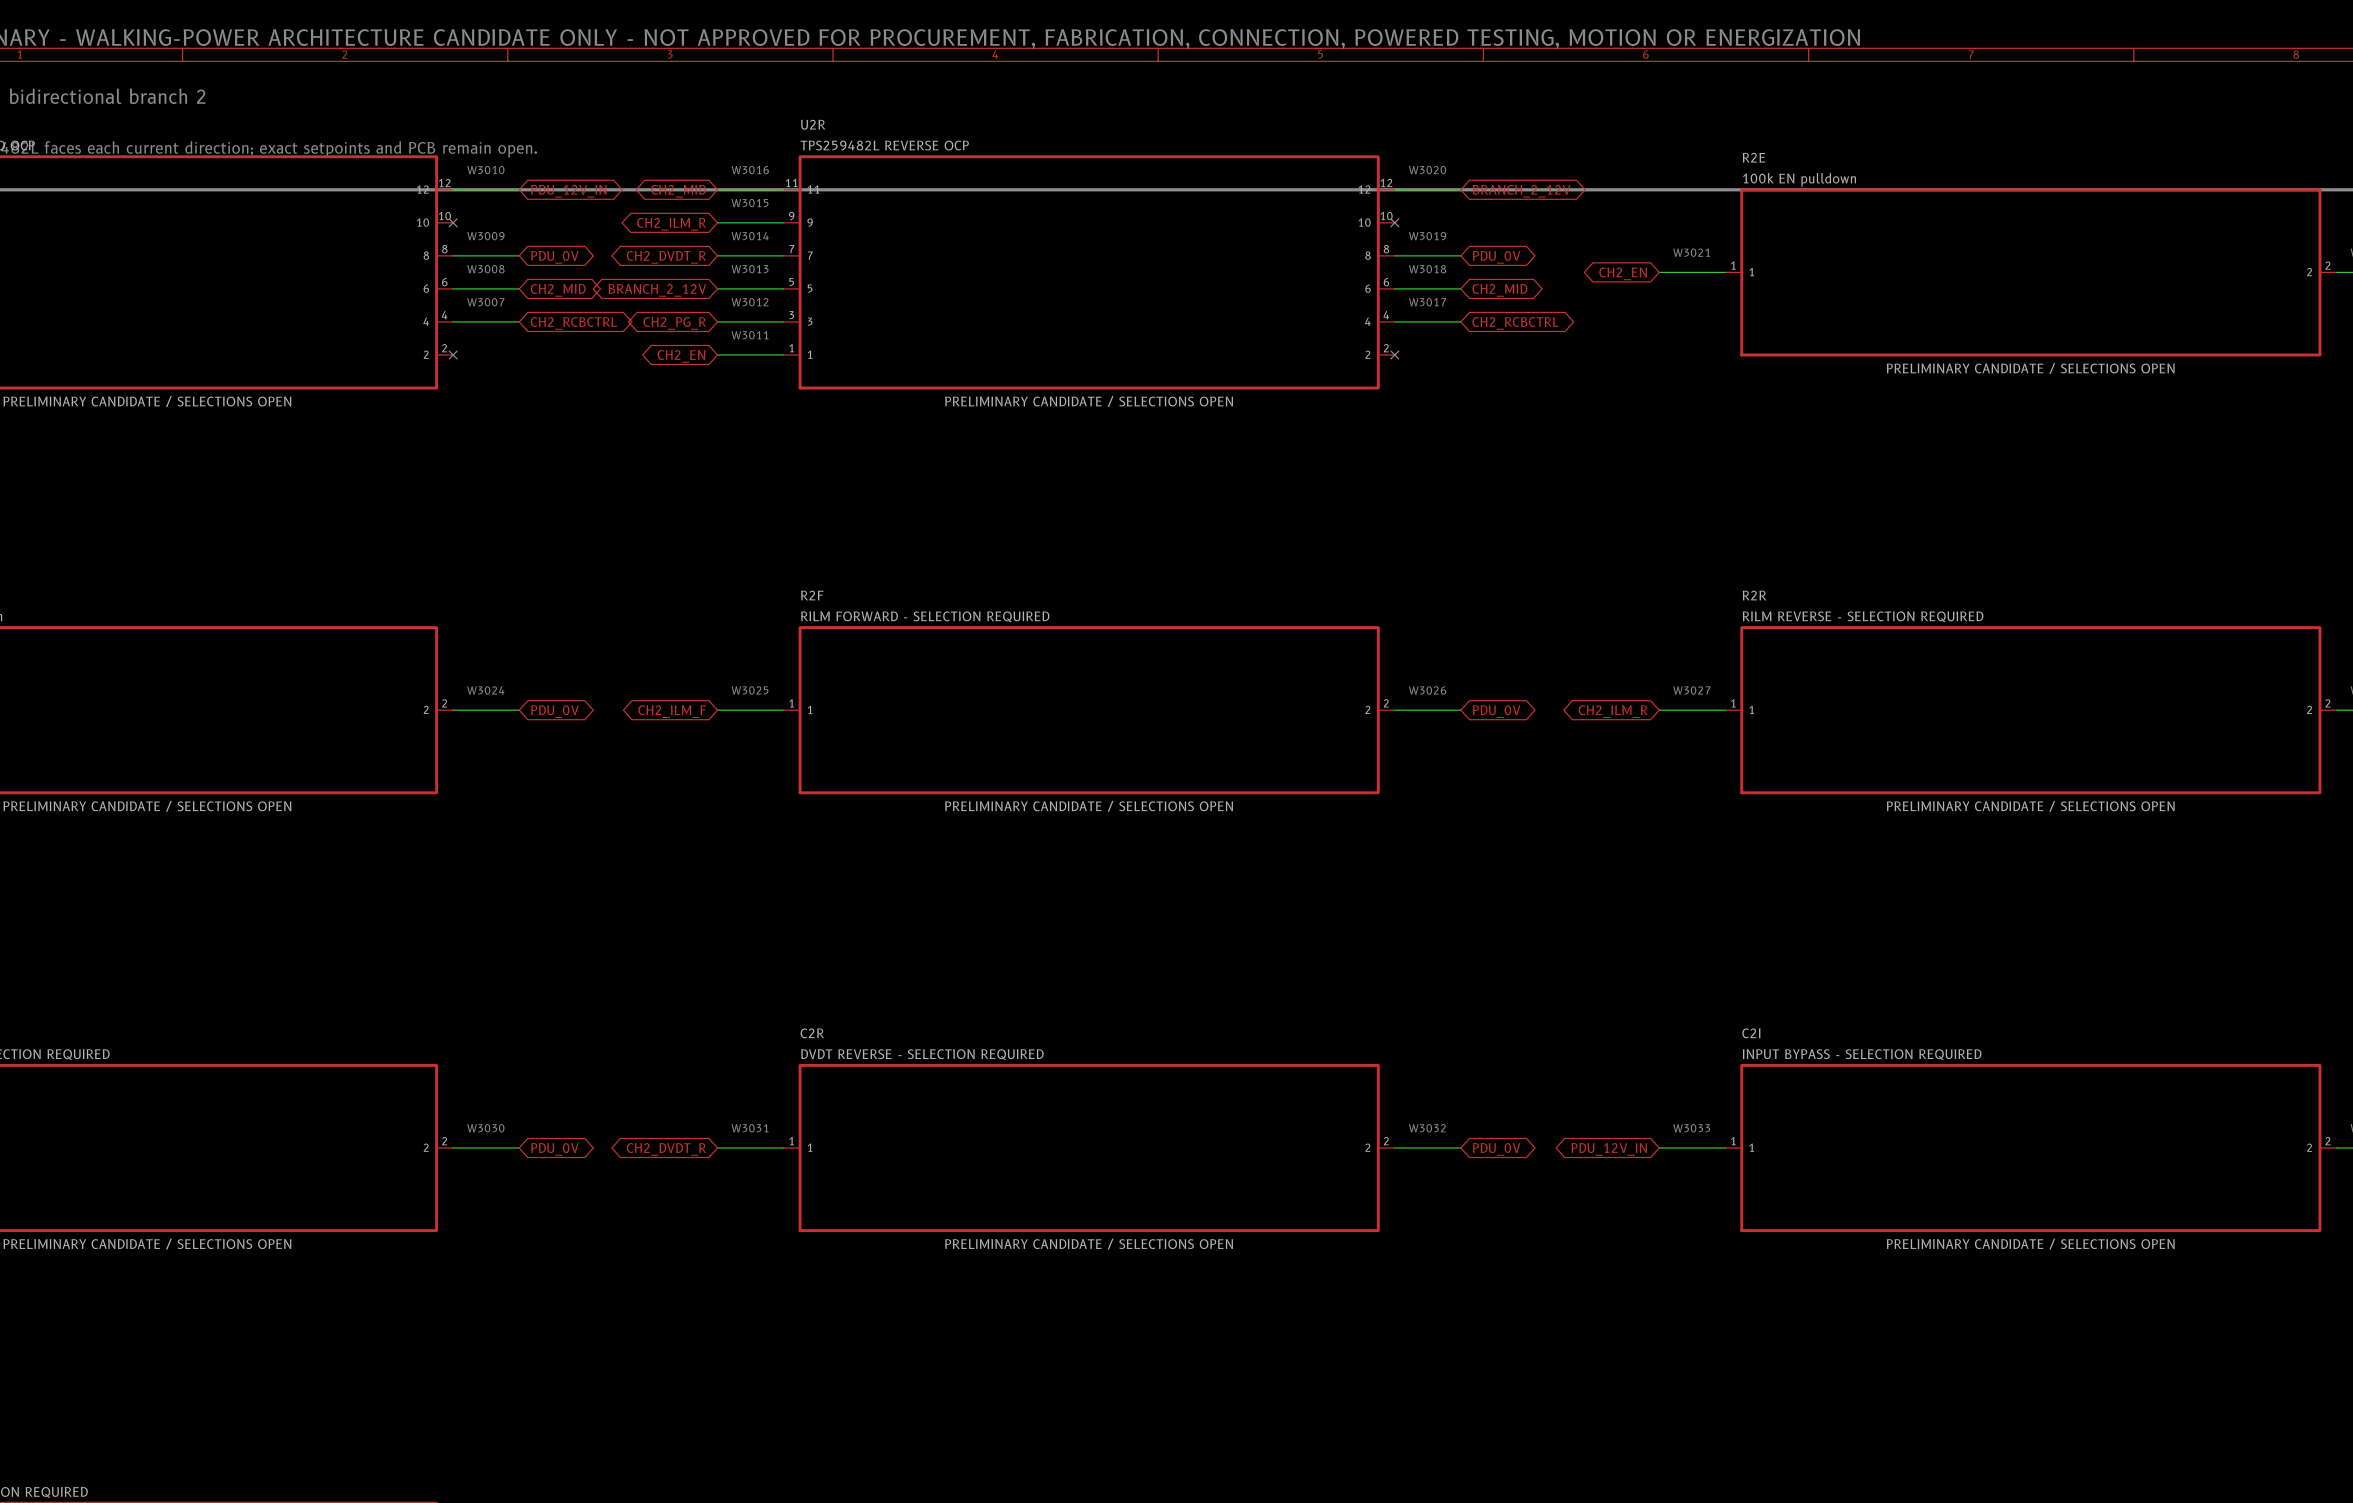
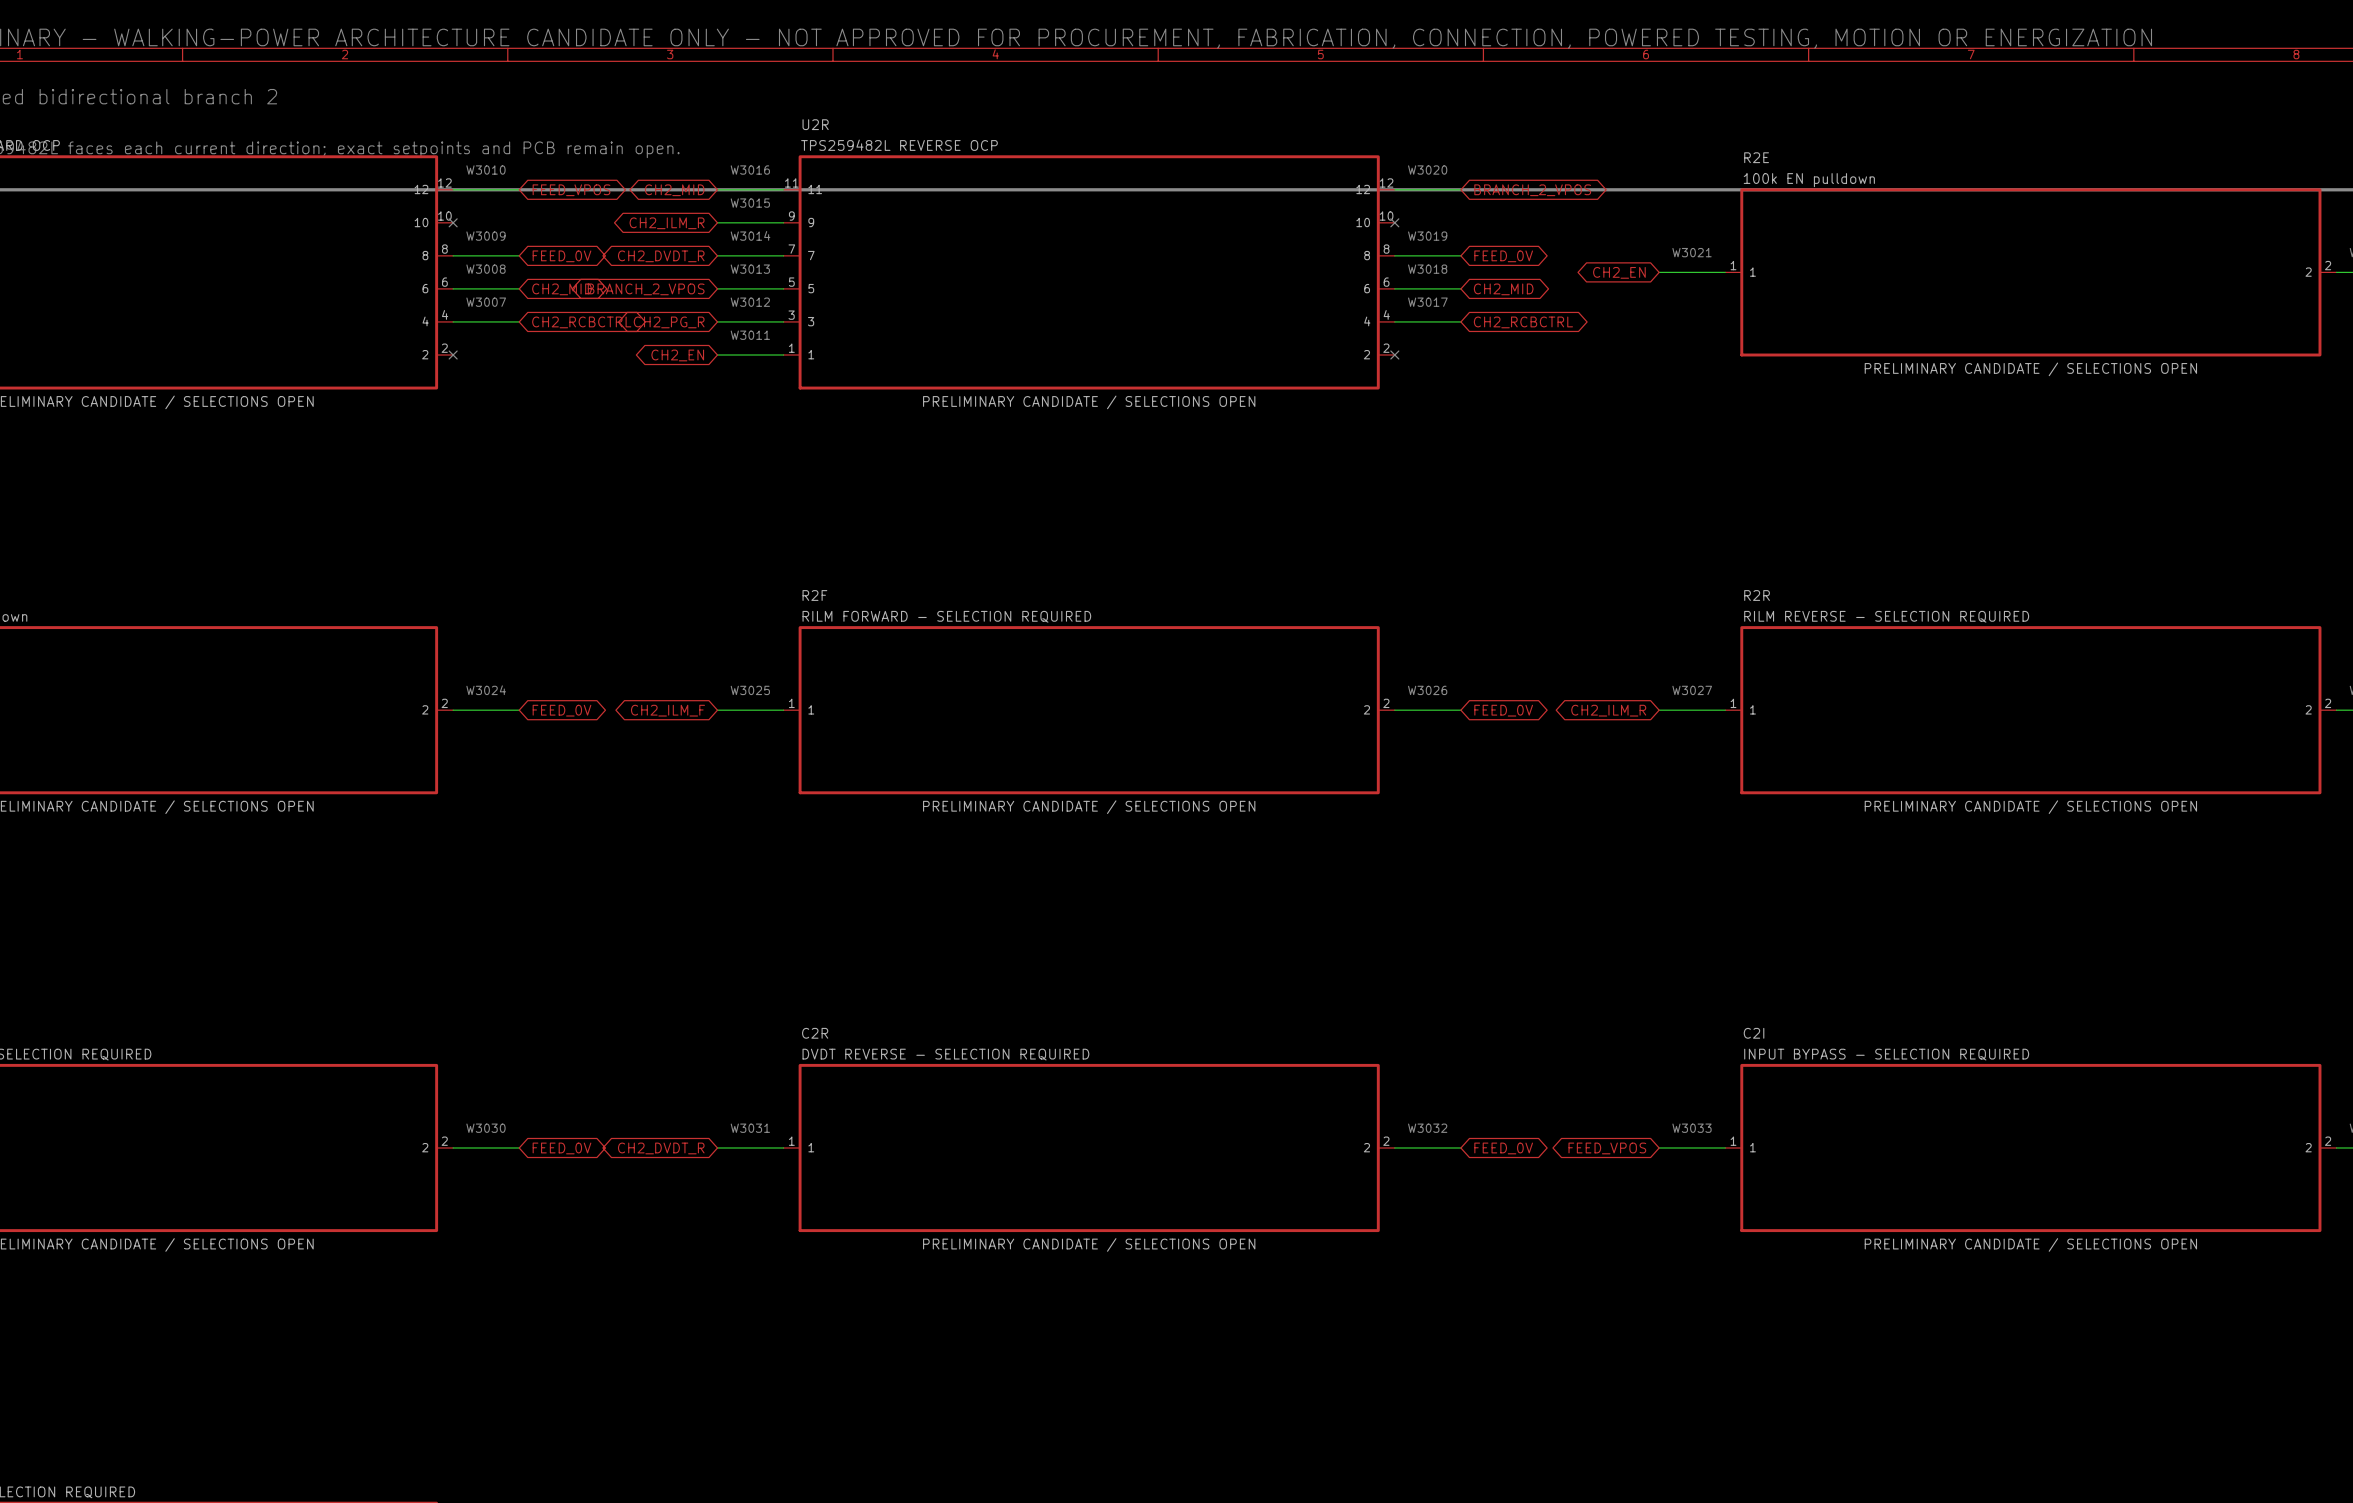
global label: PDU_12V_IN (568, 191) -> FEED_VPOS (571, 190)
global label: BRANCH_2_12V (1521, 191) -> BRANCH_2_VPOS (1532, 190)
global label: PDU_0V (554, 257) -> FEED_0V (561, 256)
global label: PDU_0V (1496, 257) -> FEED_0V (1503, 256)
global label: BRANCH_2_12V (657, 290) -> BRANCH_2_VPOS (646, 289)
global label: PDU_0V (554, 711) -> FEED_0V (561, 710)
global label: PDU_0V (1496, 711) -> FEED_0V (1503, 710)
global label: PDU_0V (554, 1149) -> FEED_0V (561, 1148)
global label: PDU_0V (1496, 1149) -> FEED_0V (1503, 1148)
global label: PDU_12V_IN (1609, 1149) -> FEED_VPOS (1607, 1148)

